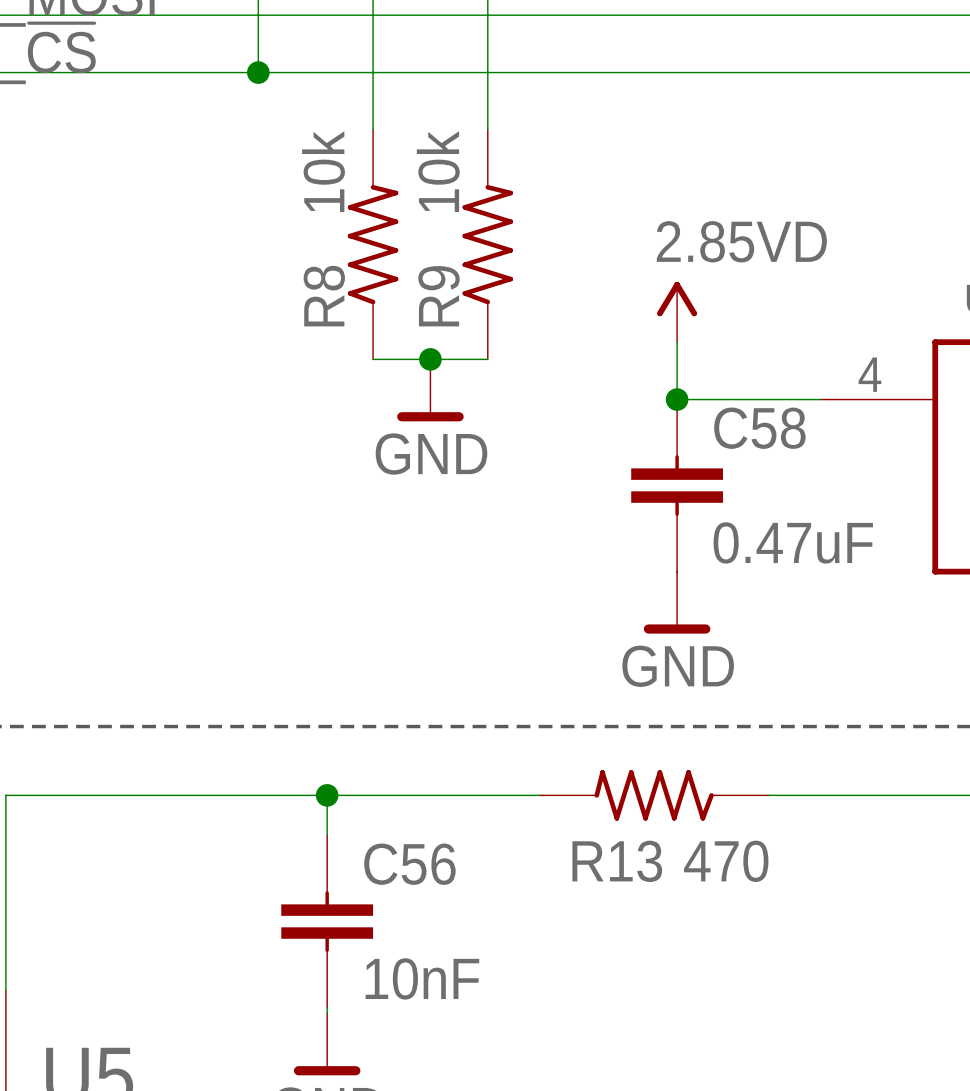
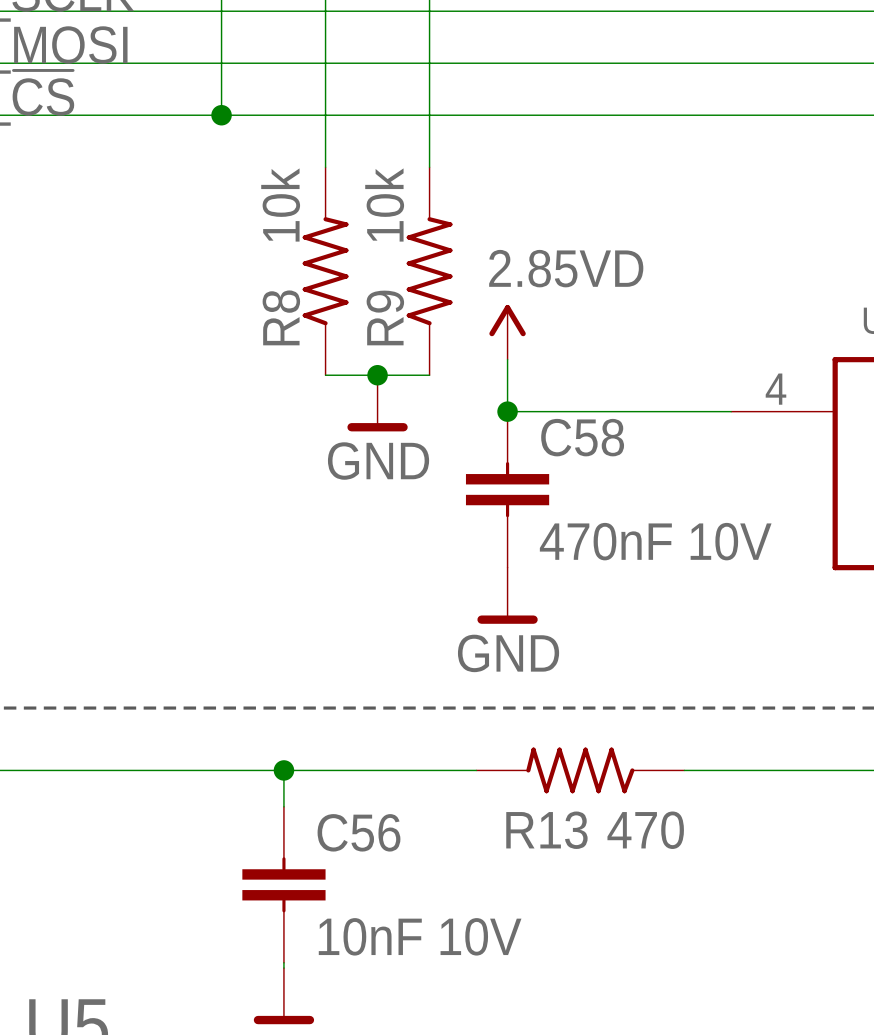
power symbol position: 2.85VD (677, 312) -> 2.85VD (507, 332)
wire: (677, 342) (677, 399) -> (507, 359) (507, 411) (601, 411)
junction position: (677, 399) -> (507, 411)
C58 position: (677, 485) -> (507, 489)
C58 value: 0.47uF (793, 542) -> 470nF 10V (655, 541)
power symbol position: GND (677, 602) -> GND (507, 595)
C56 value: 10nF (422, 978) -> 10nF 10V (420, 936)

